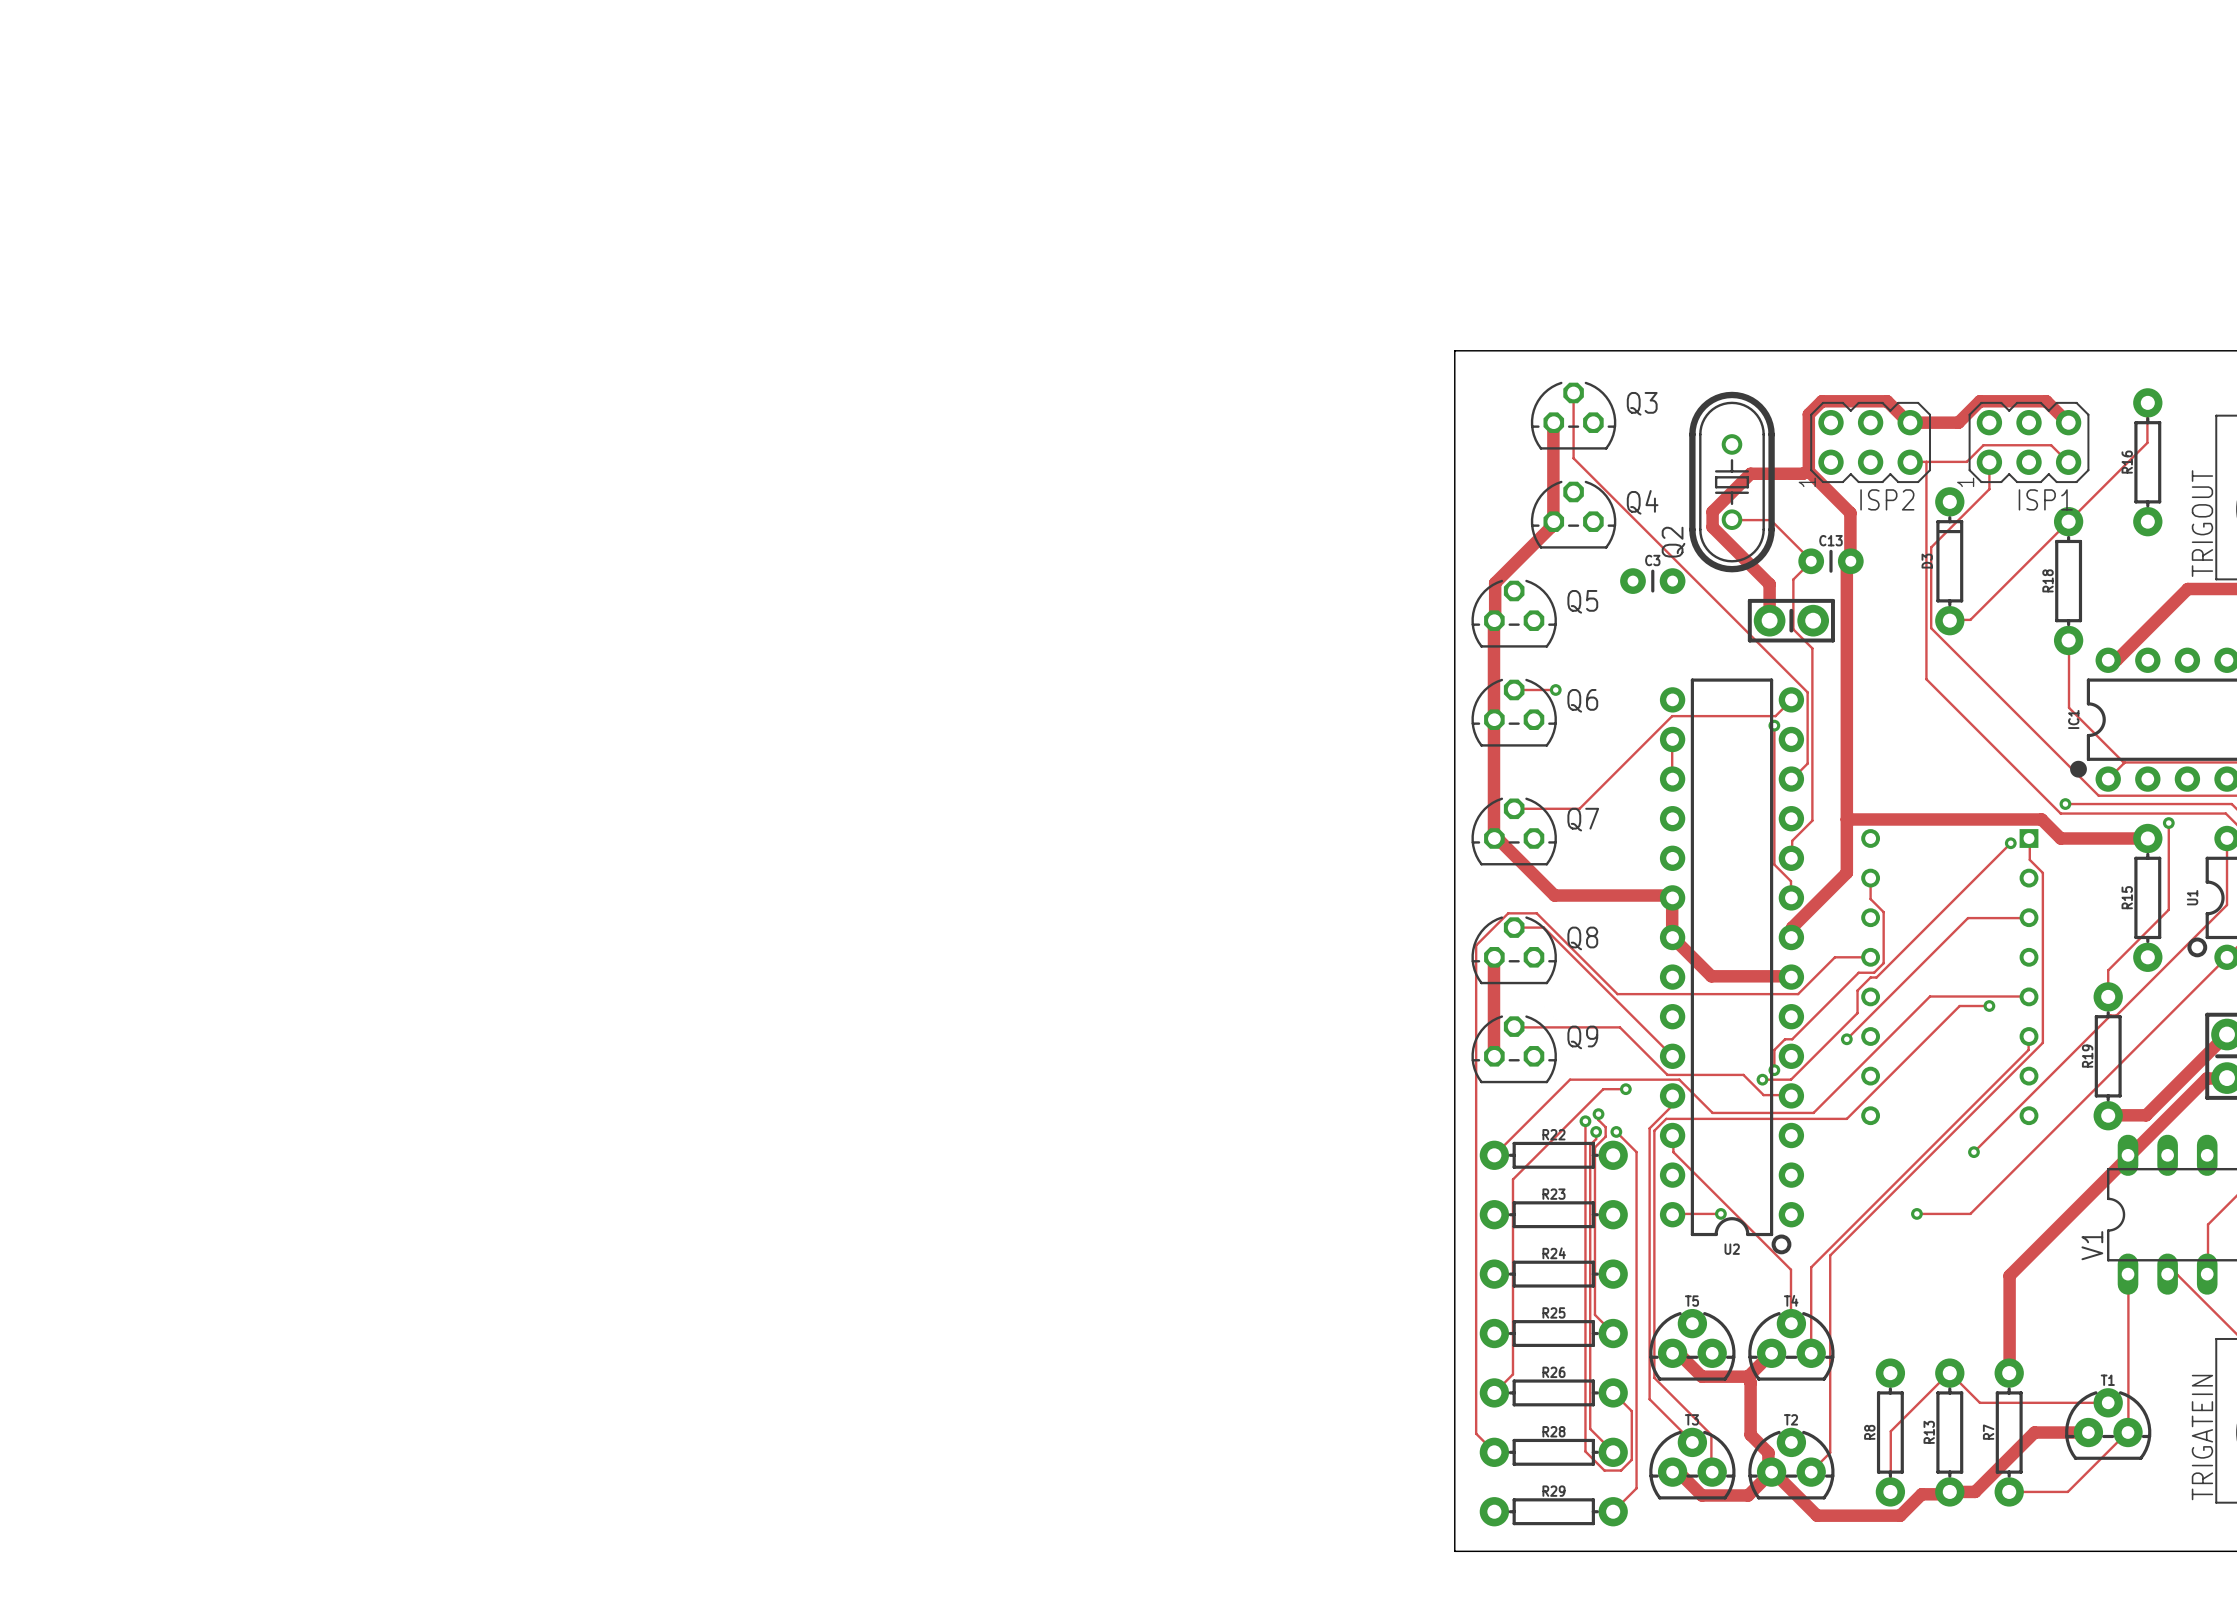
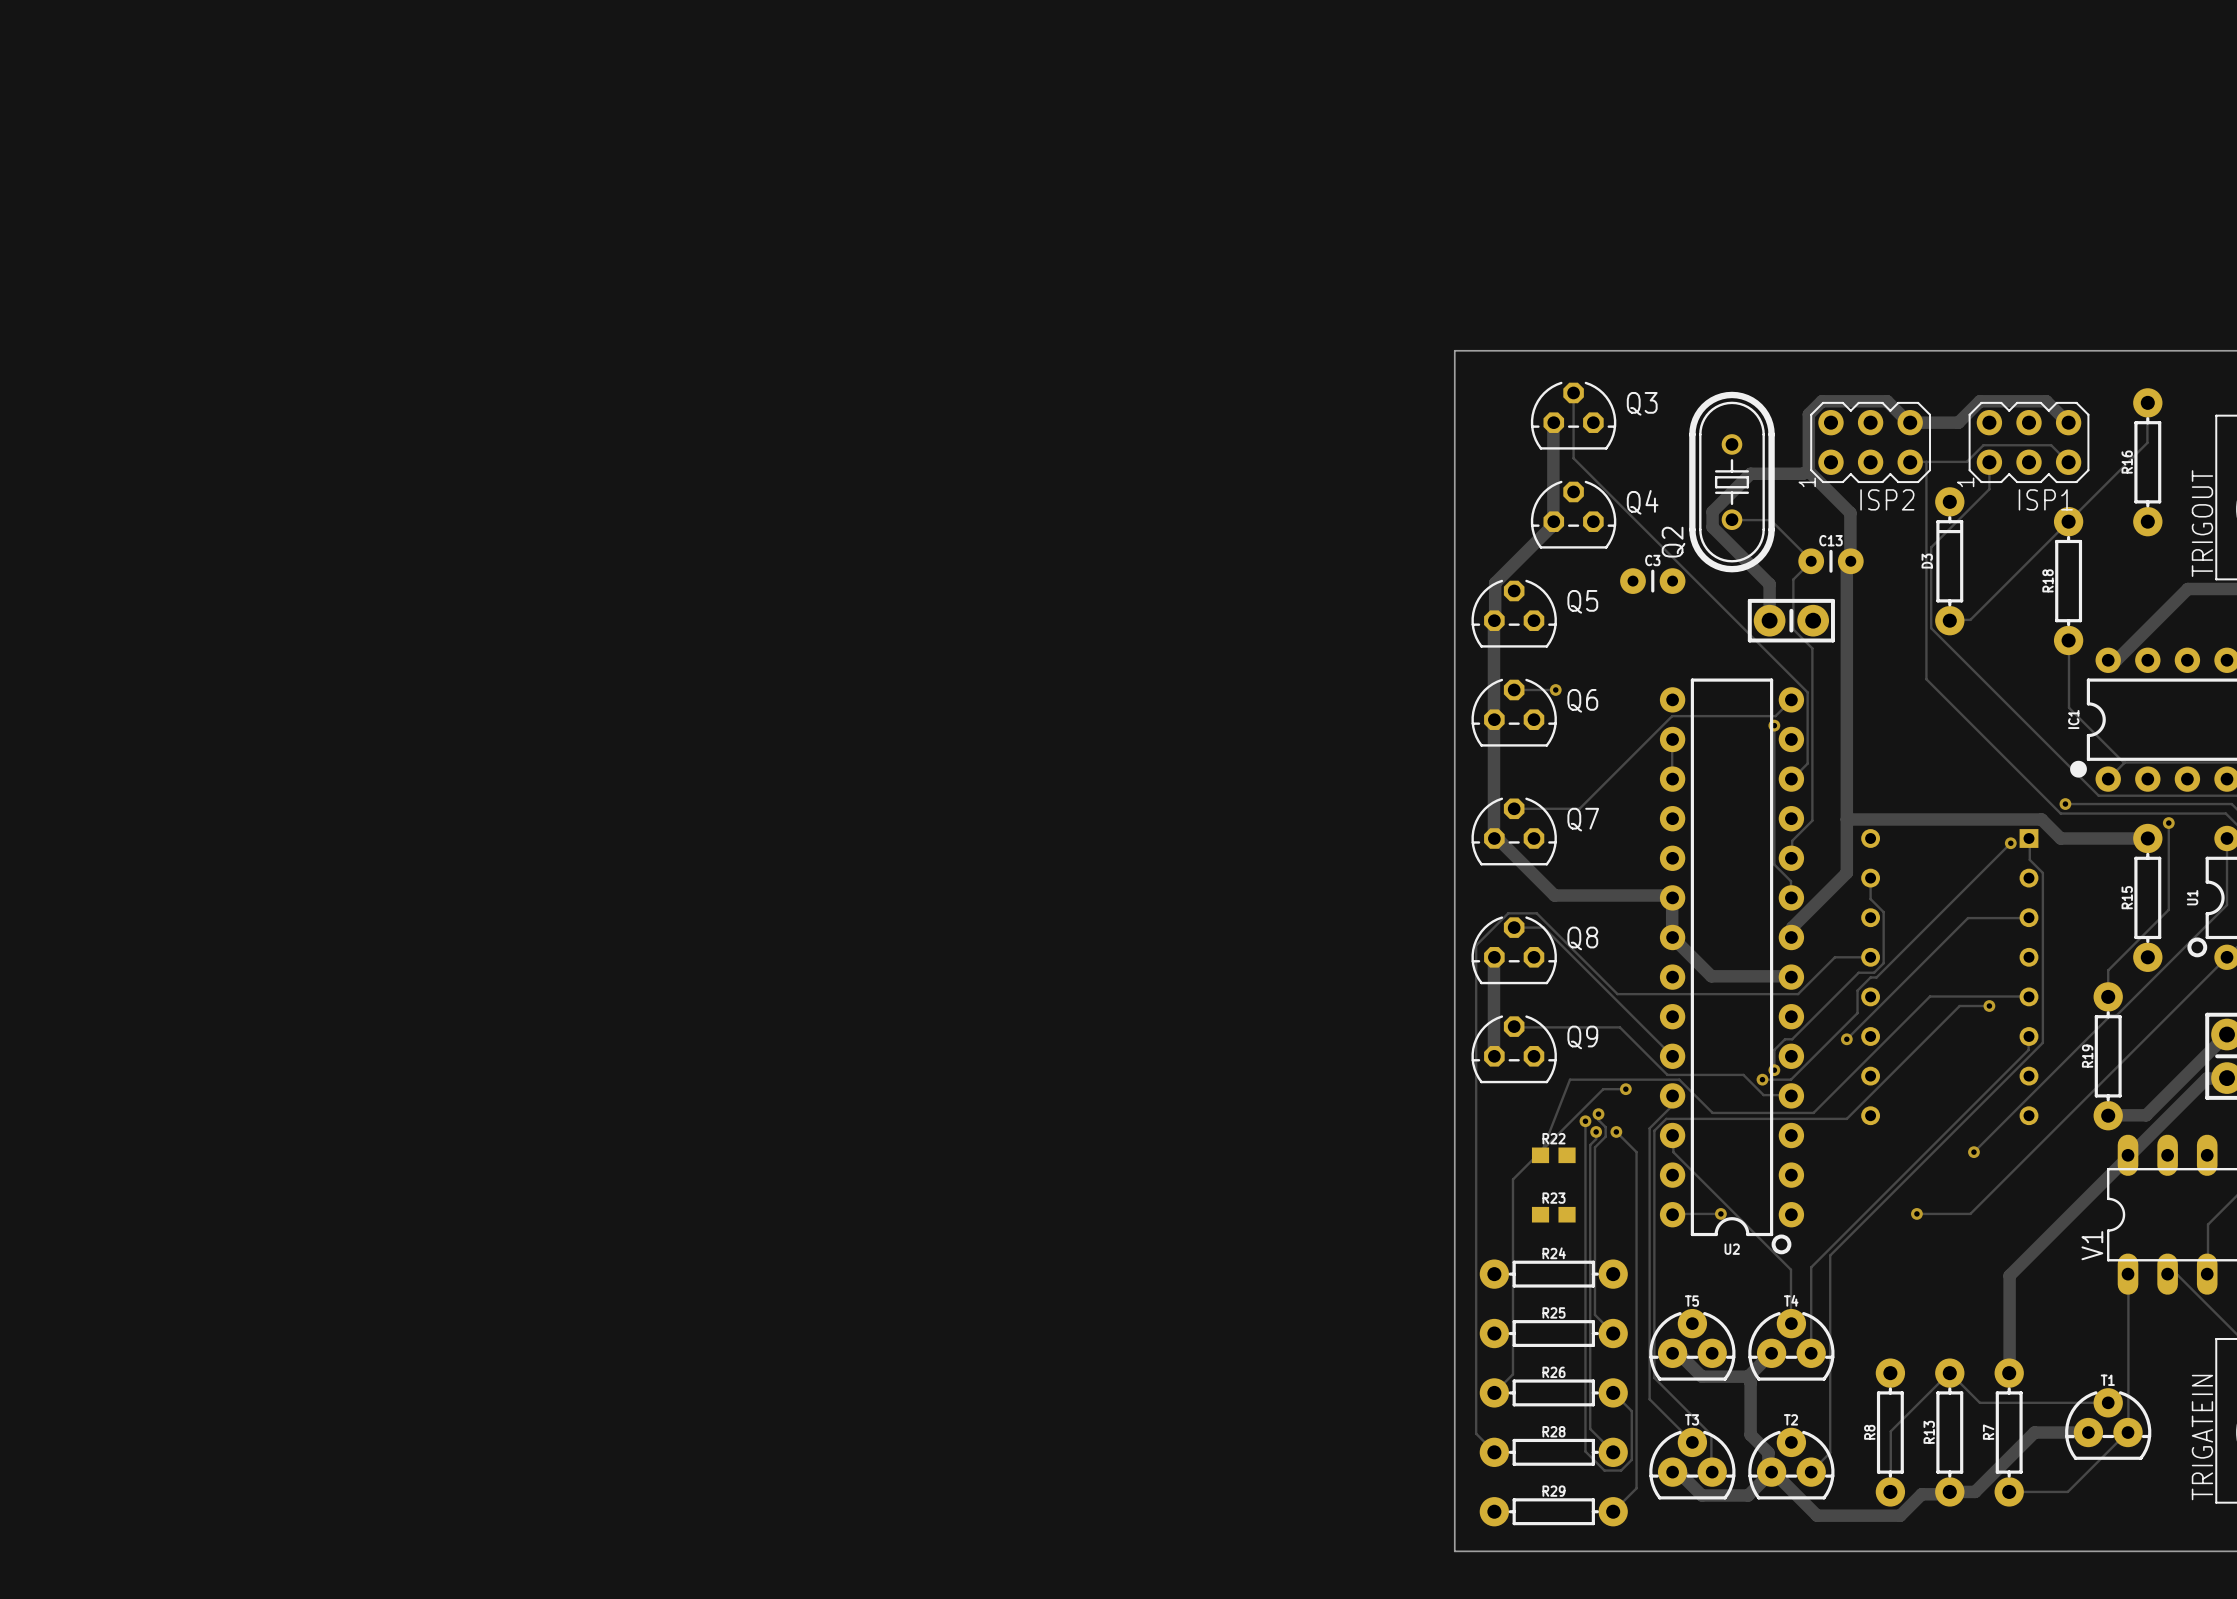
track: (1570, 1079) (1494, 1155) -> (1570, 1079) (1540, 1155)
R22 footprint: [1479, 1140, 1628, 1170] -> [1531, 1147, 1576, 1164]
R23 footprint: [1479, 1200, 1628, 1230] -> [1531, 1206, 1576, 1223]

